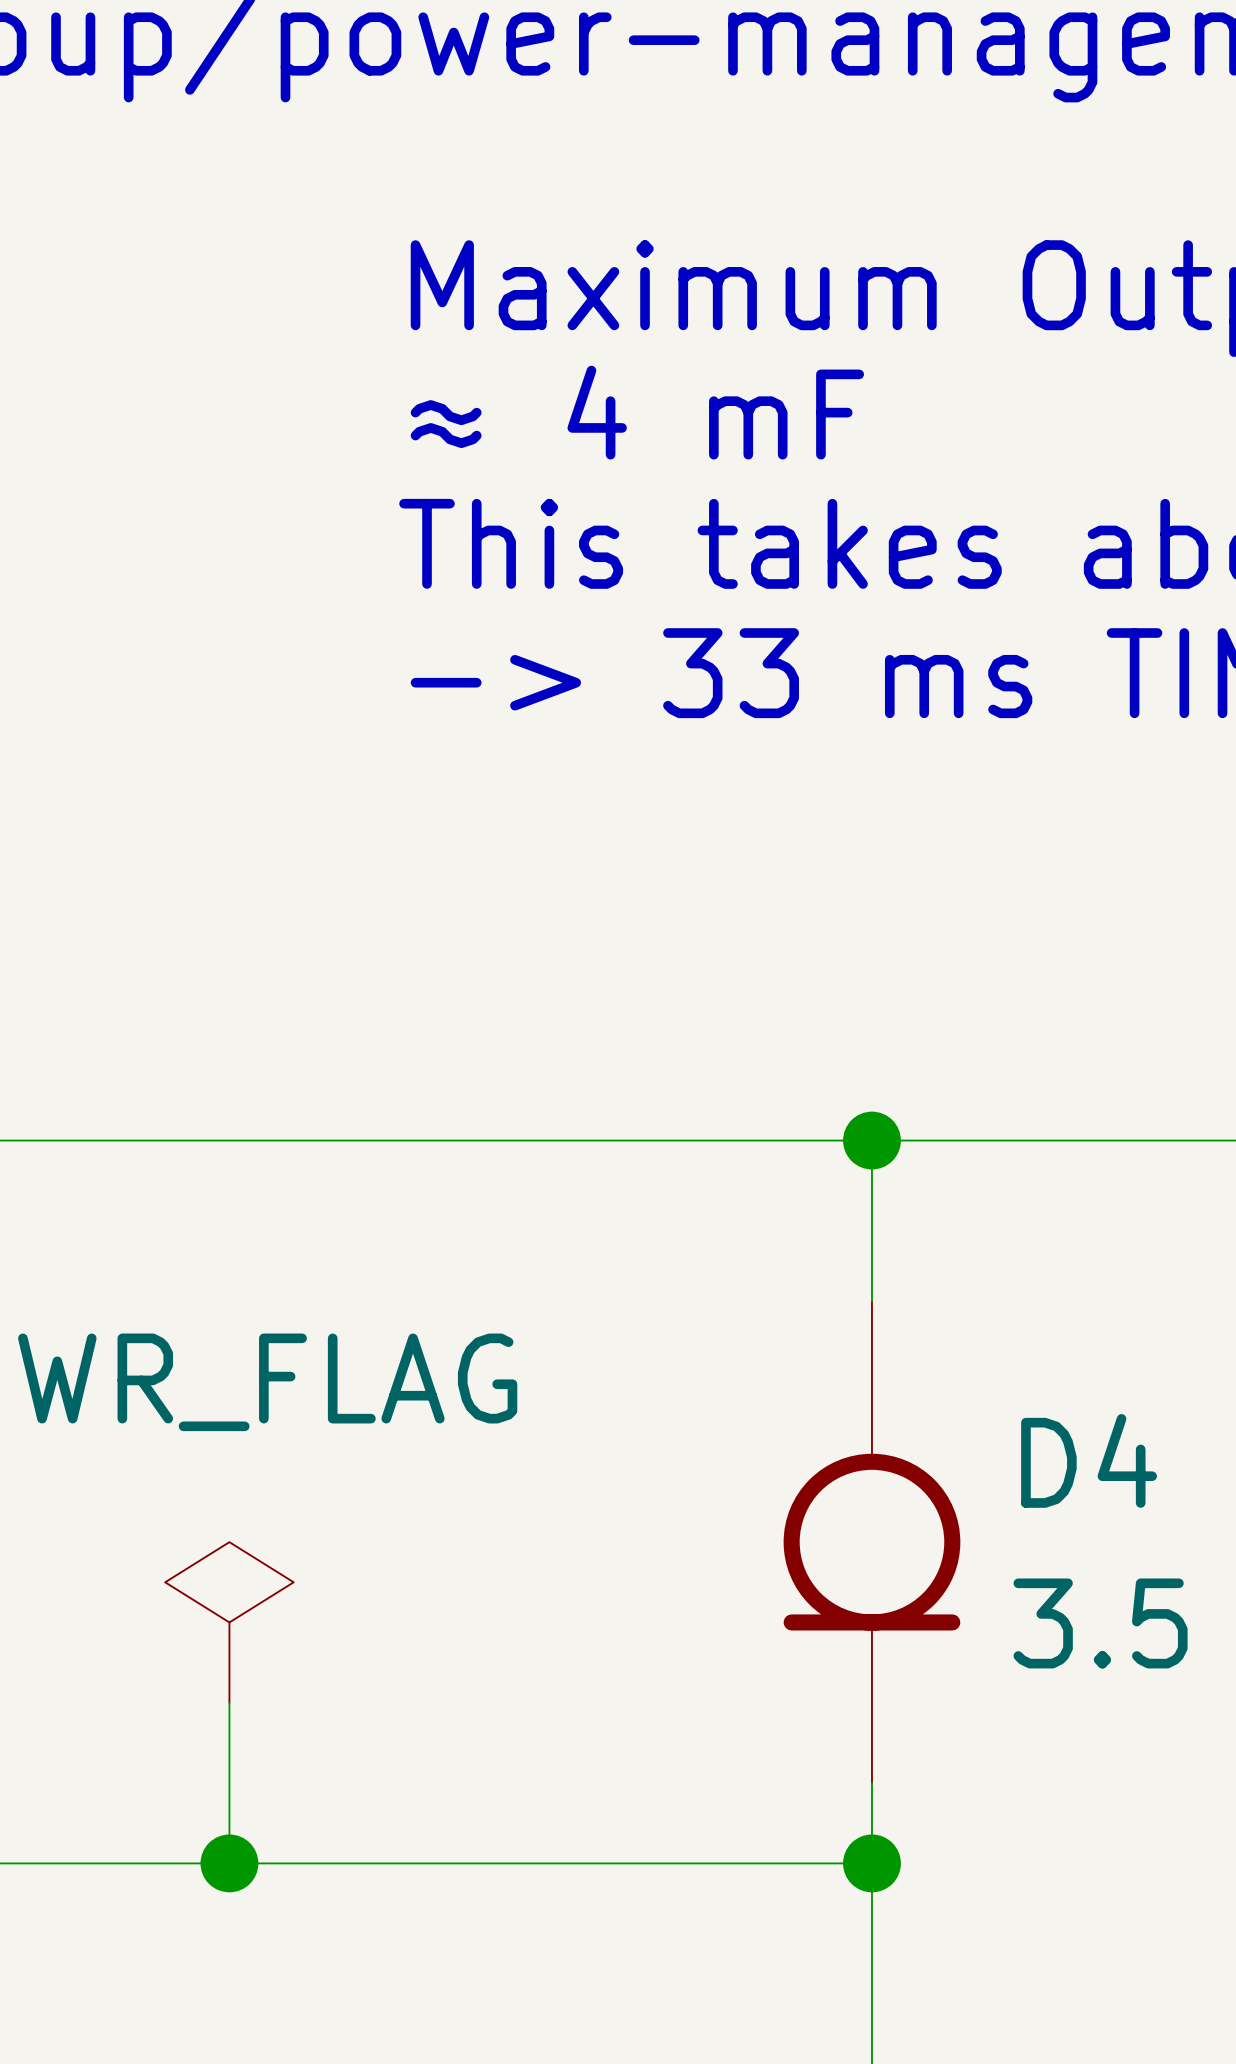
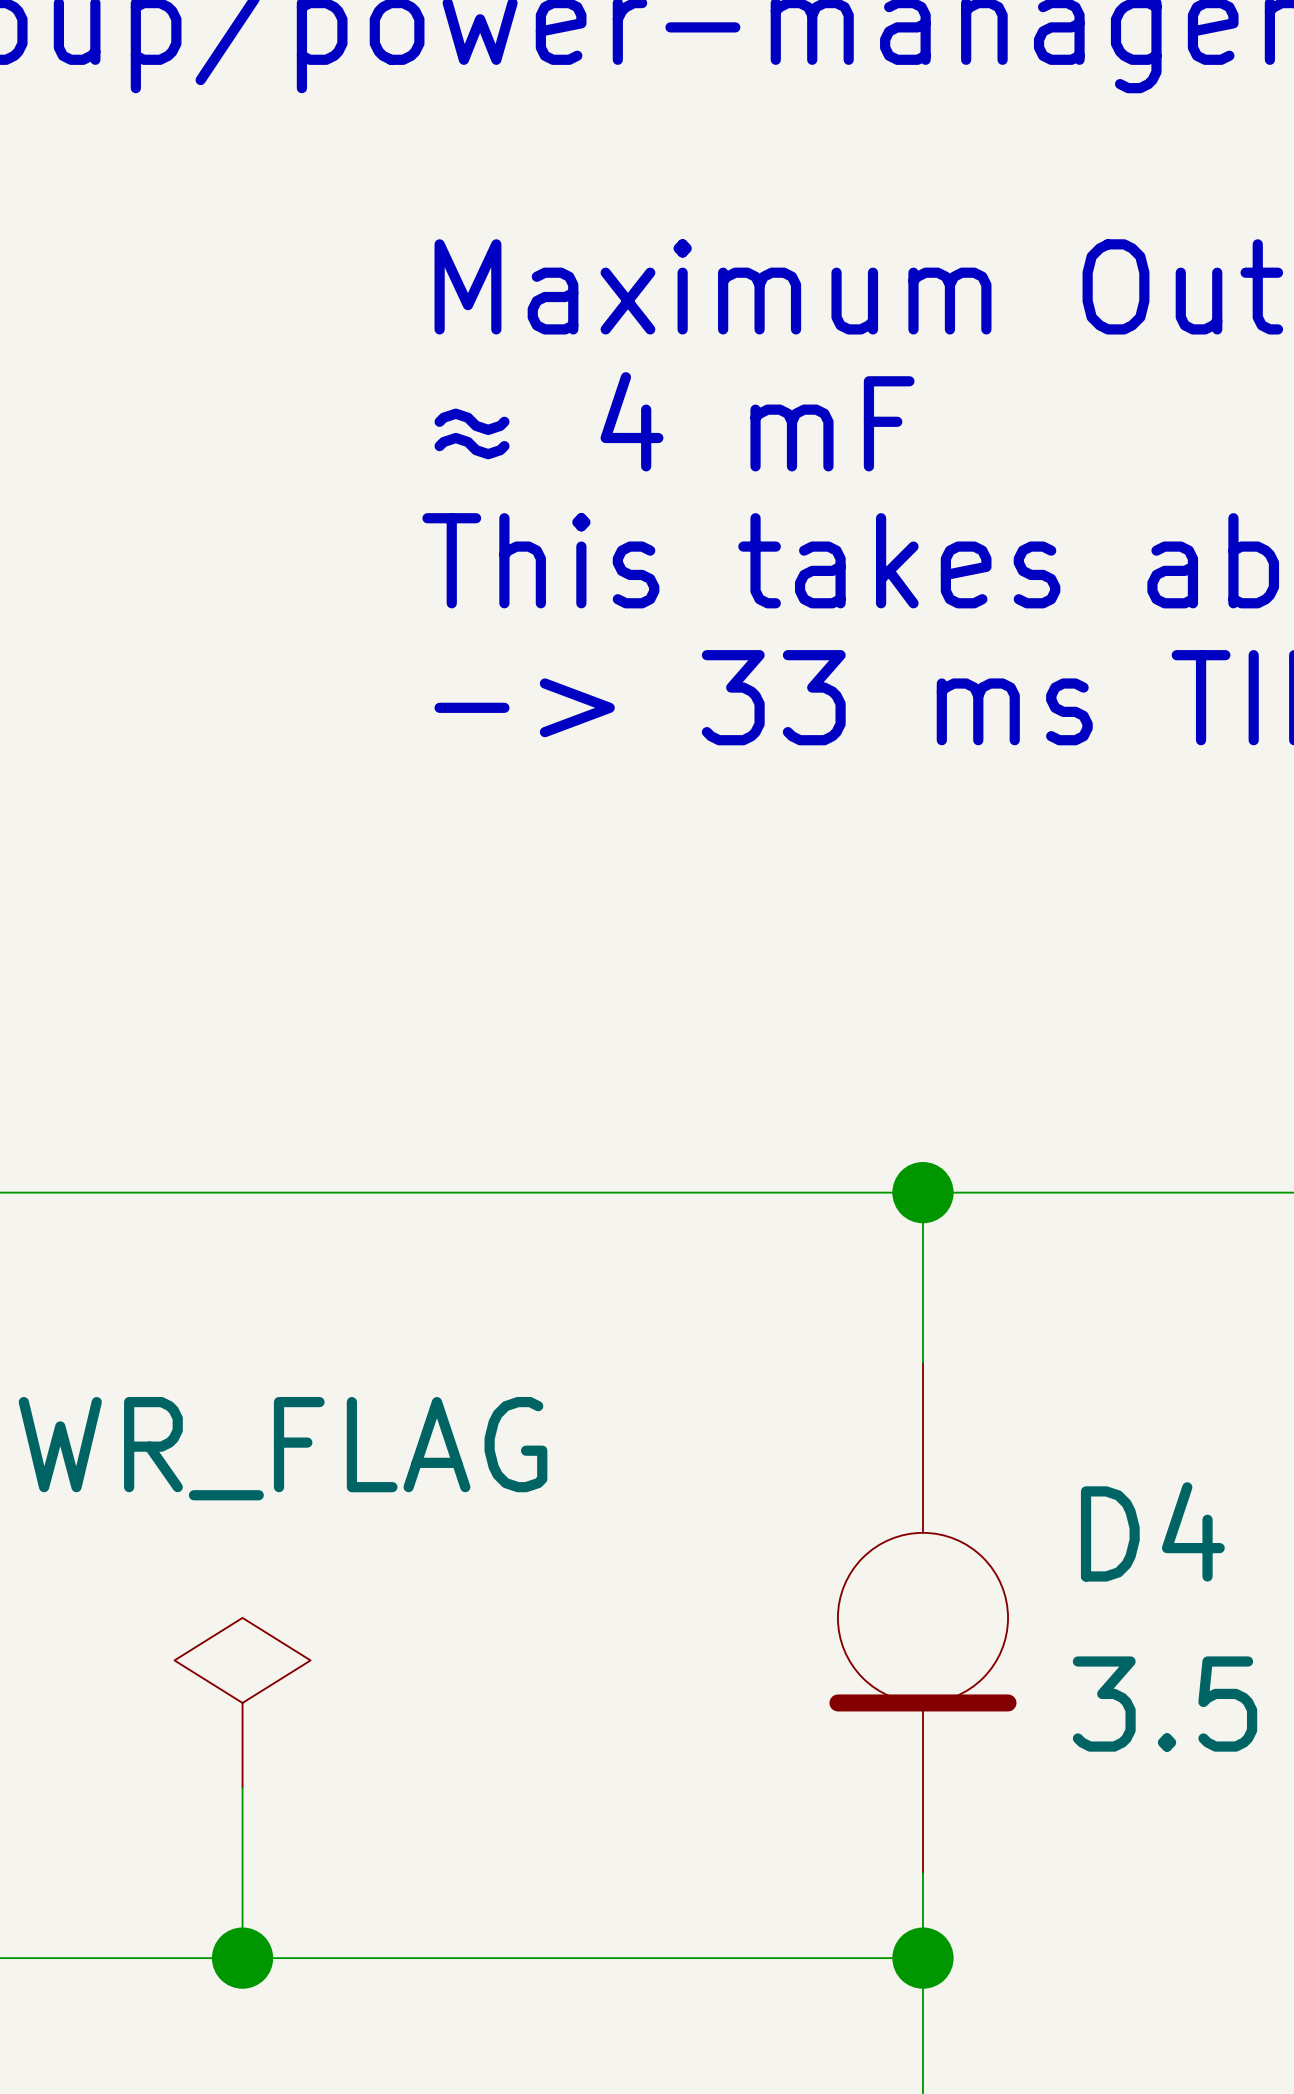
D4 symbol: [783, 1301, 961, 1784] -> [829, 1362, 1017, 1874]

